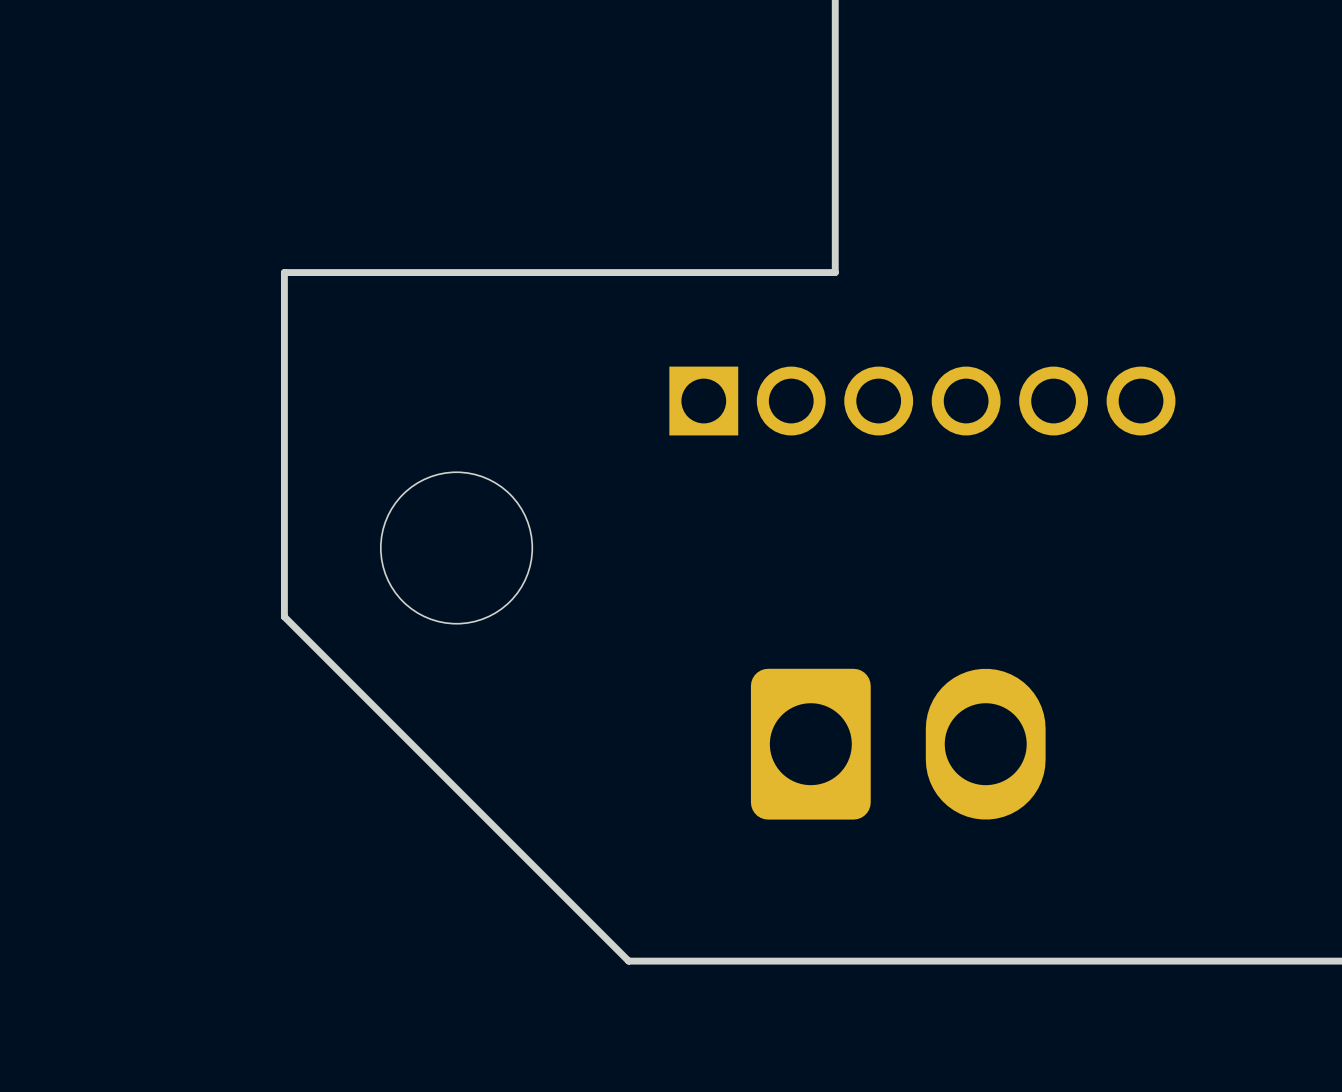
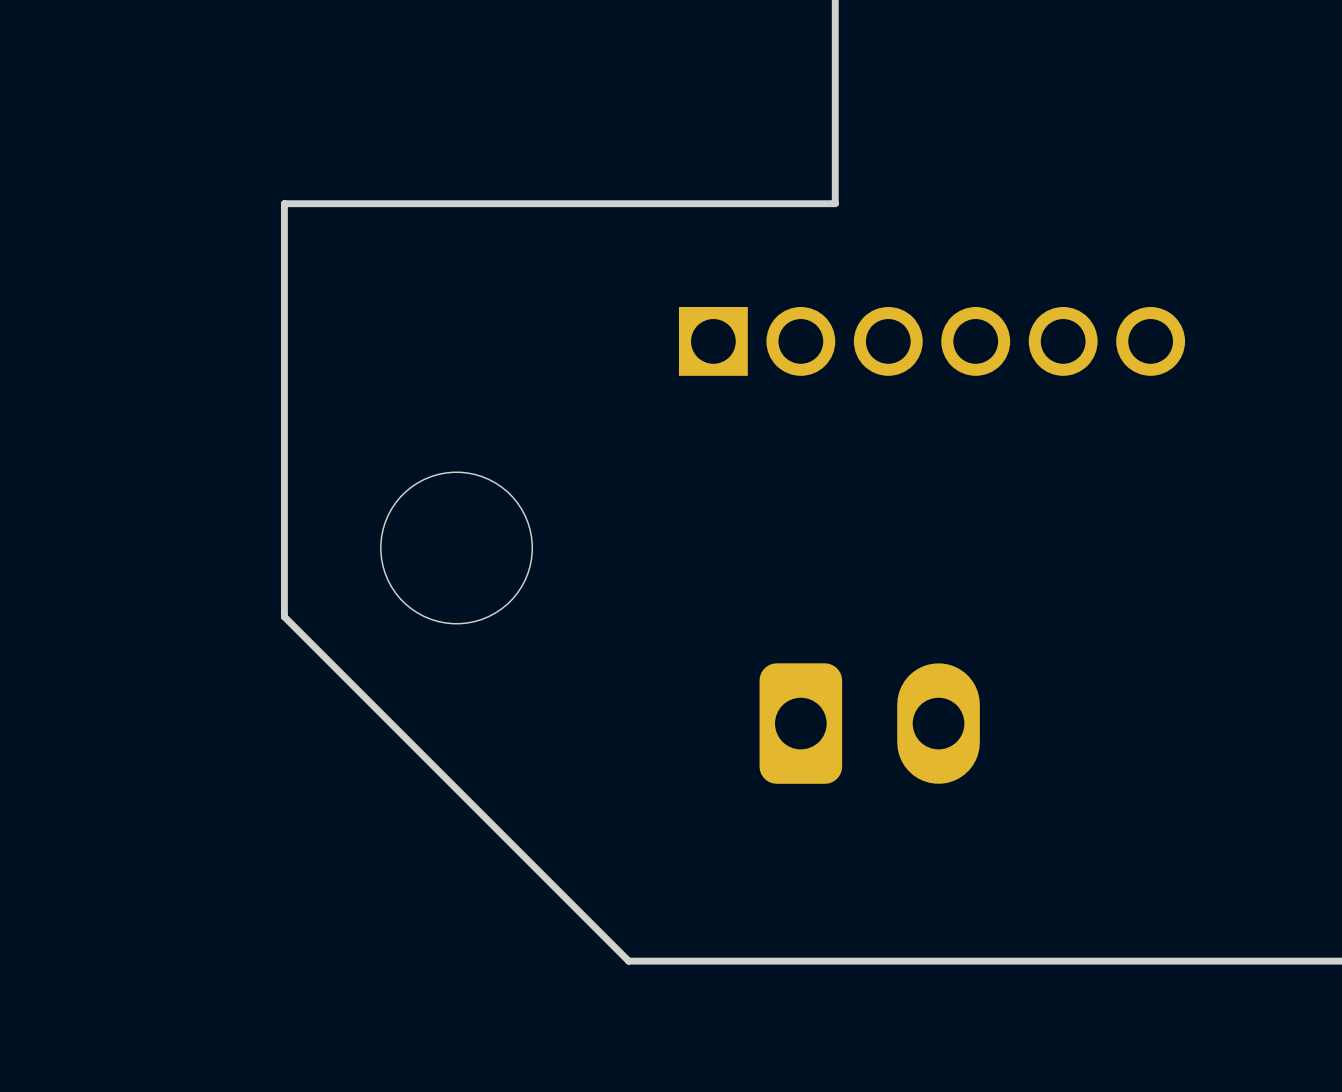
board edge: (835, 203) (835, 272) (284, 272) -> (835, 203) (284, 203) (284, 272)
part position: (922, 401) -> (932, 341)
part footprint: [750, 668, 1046, 820] -> [759, 663, 980, 784]

